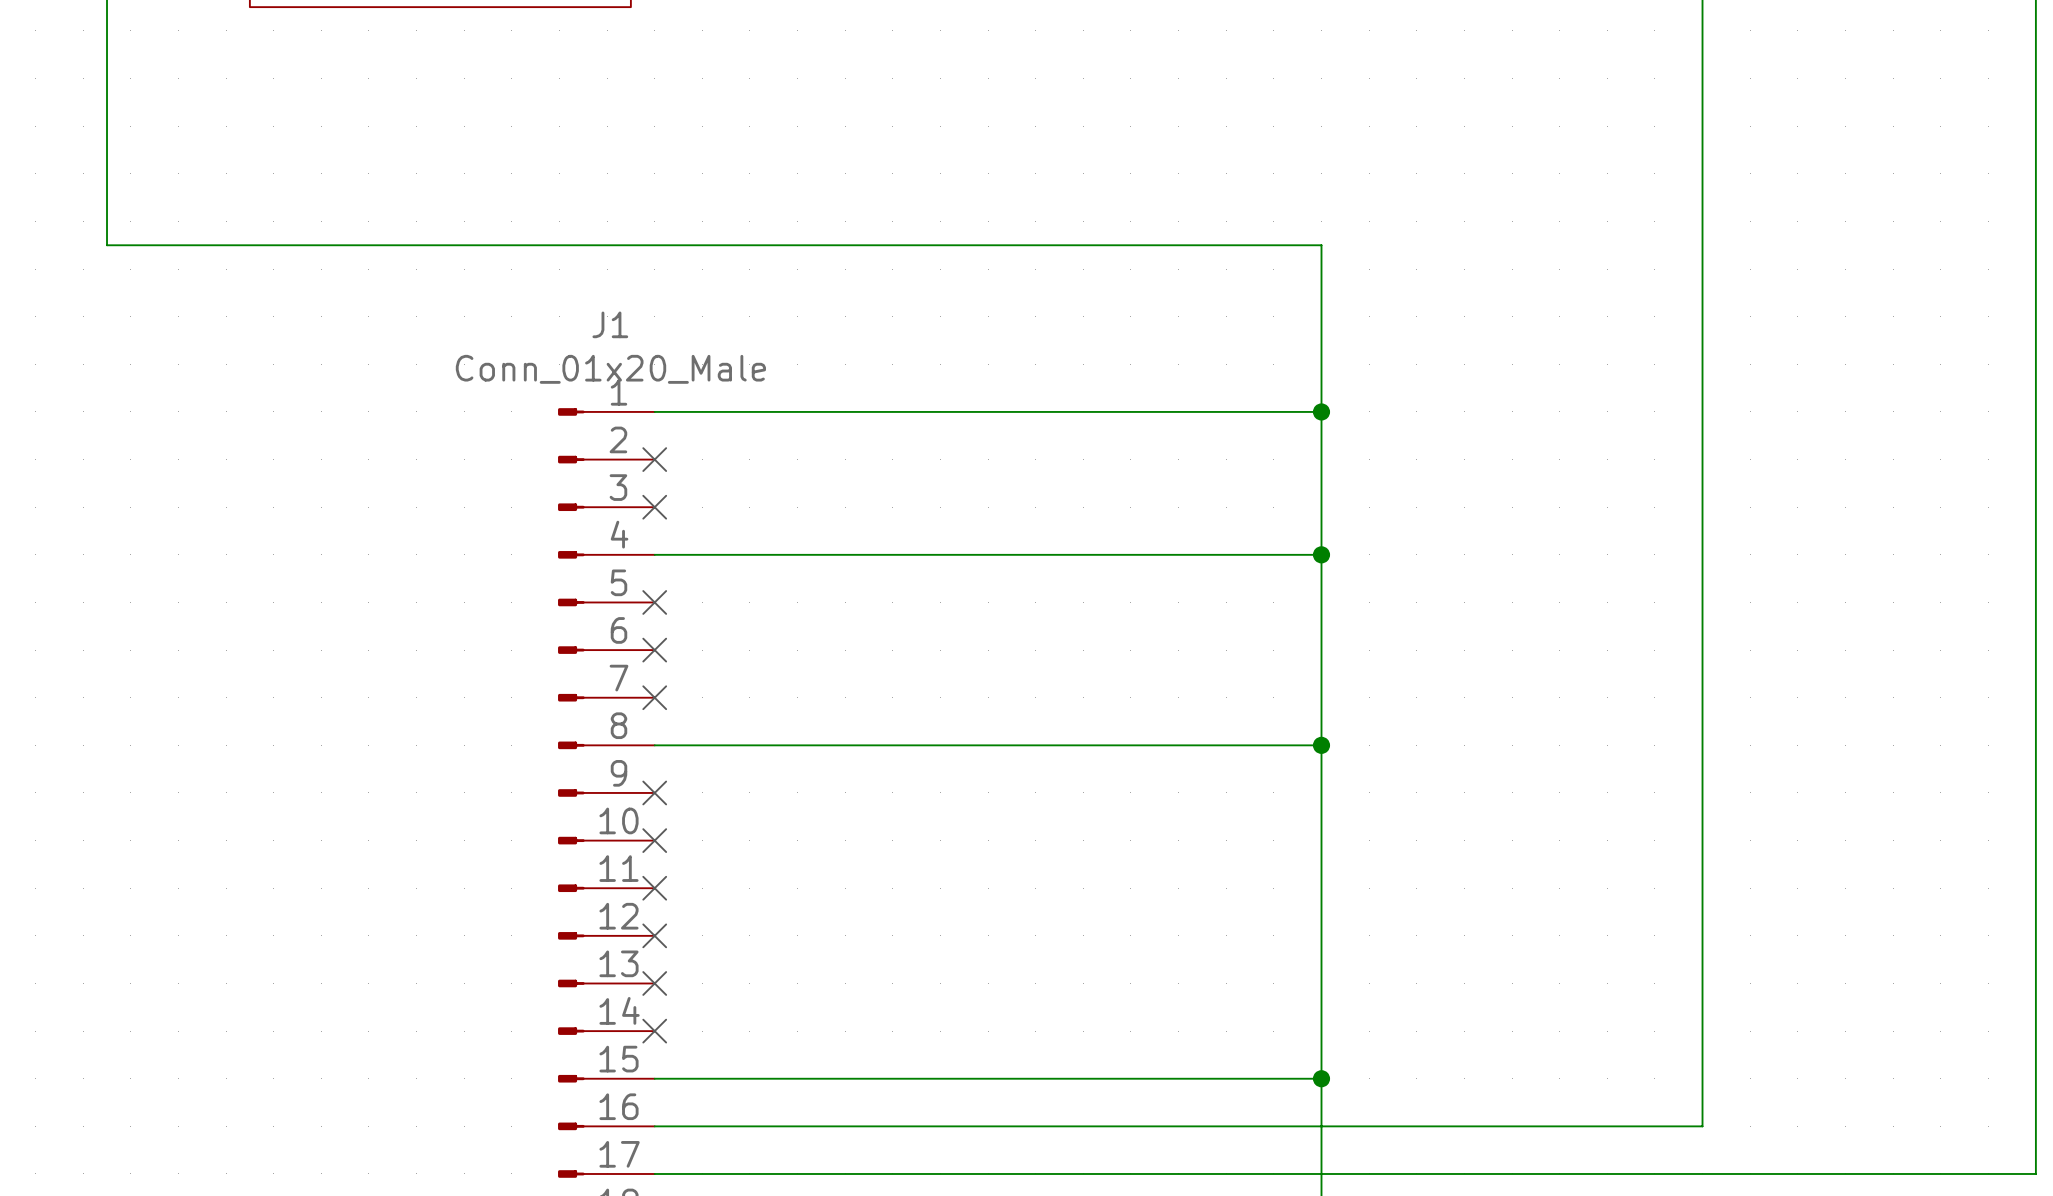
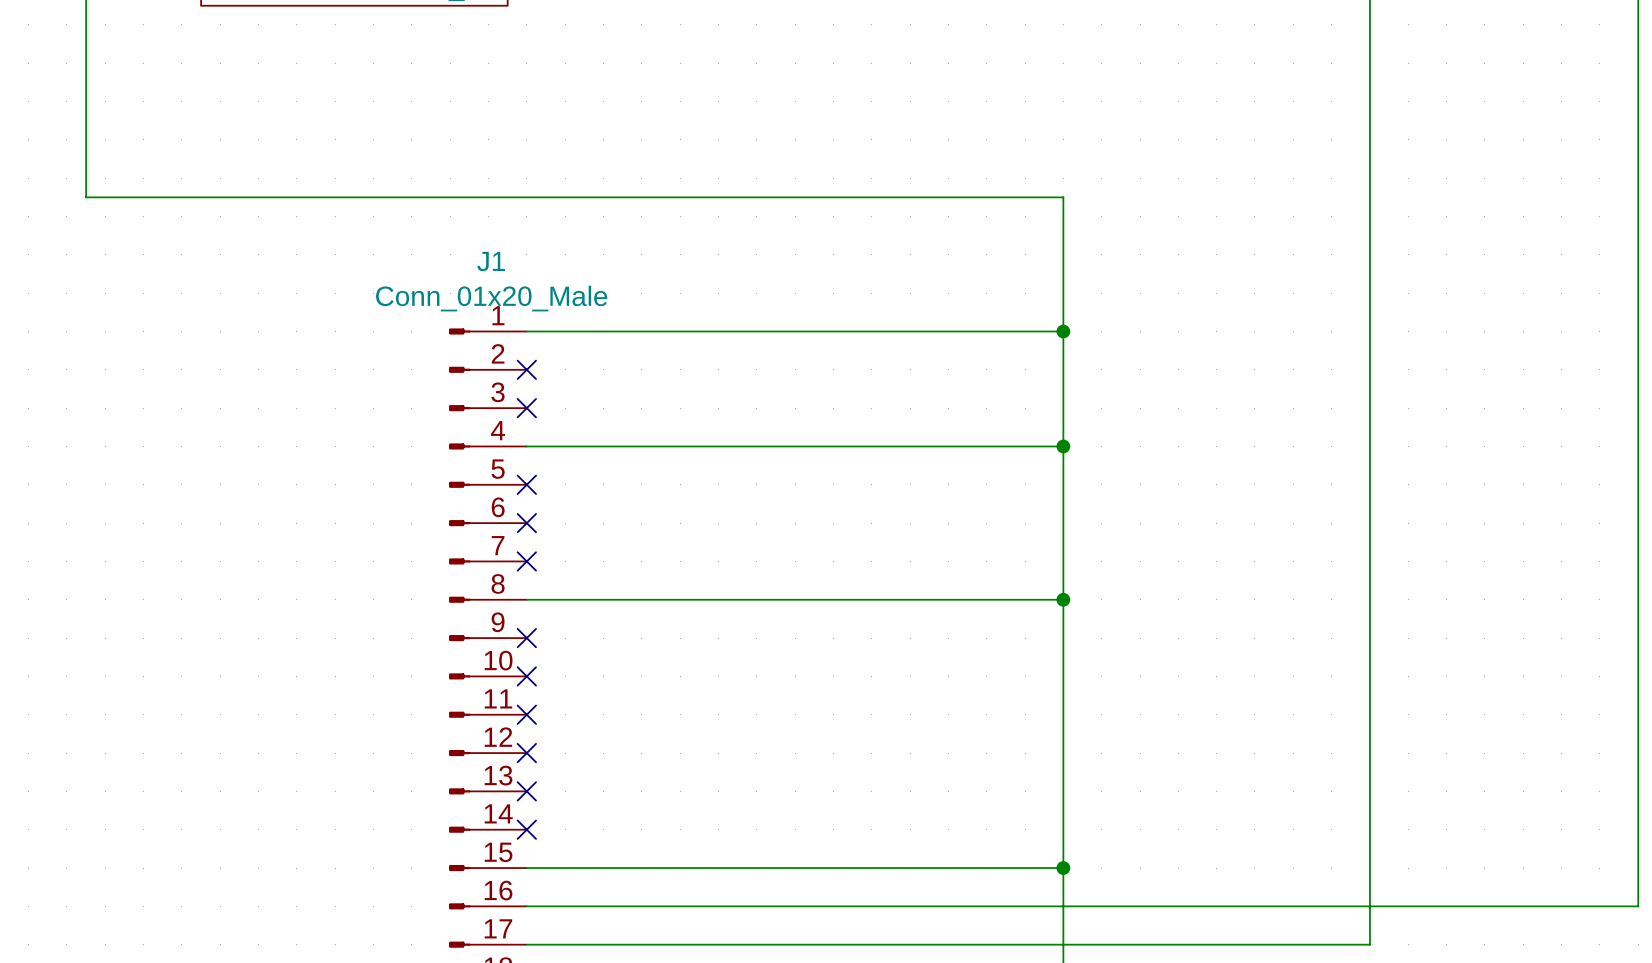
wire: (2035, 1126) (2035, 1173) (1702, 1173) -> (1638, 906) (1369, 906) (1369, 944)

